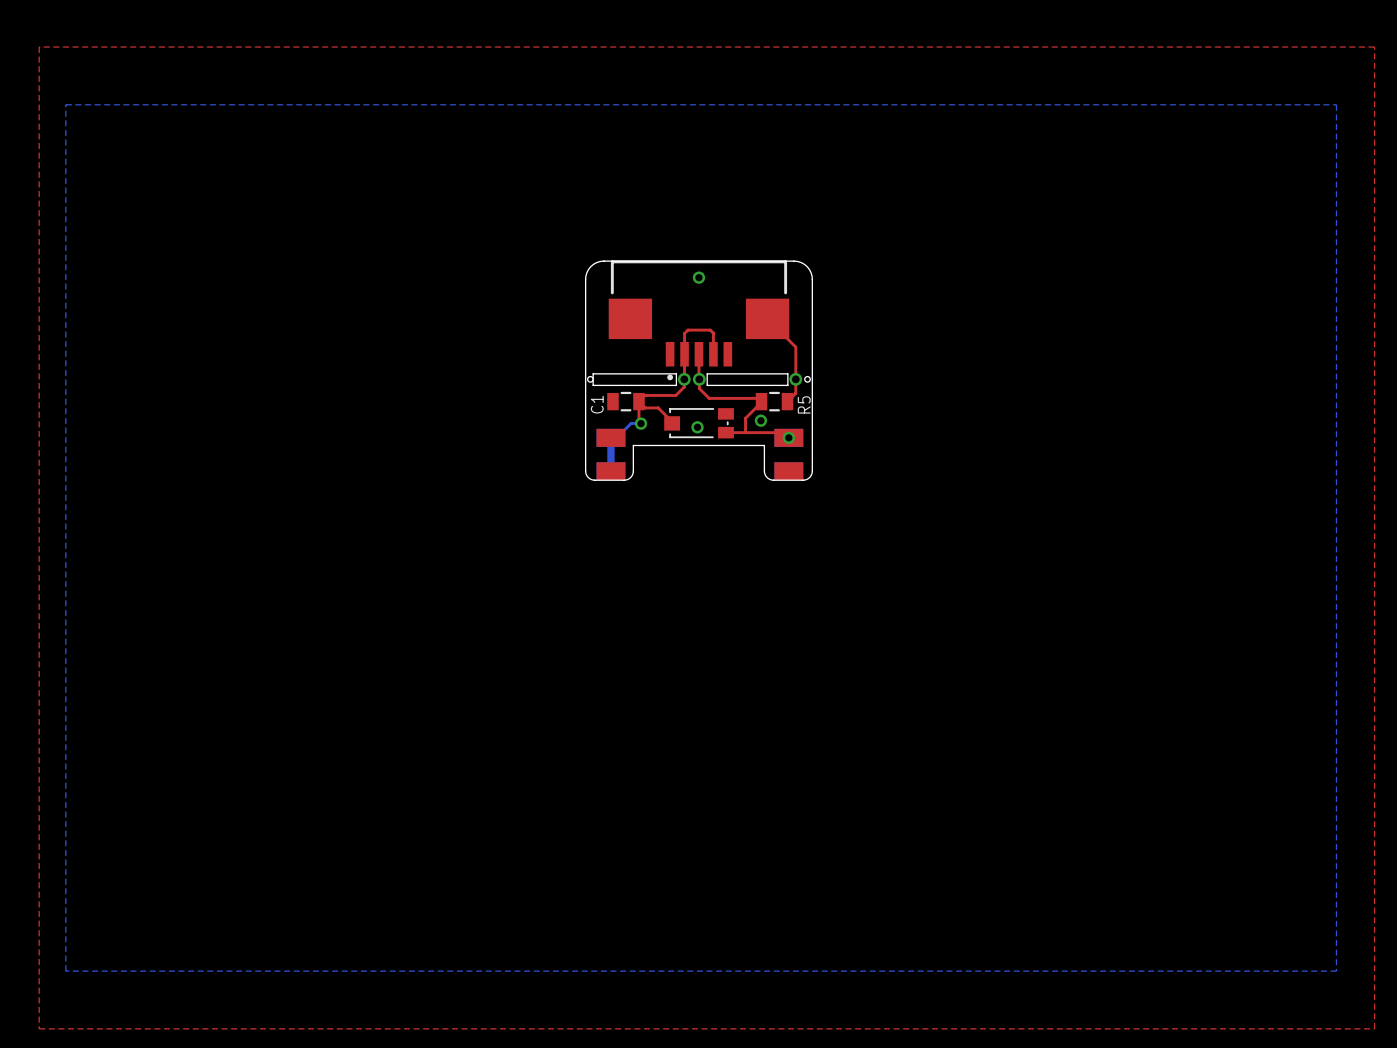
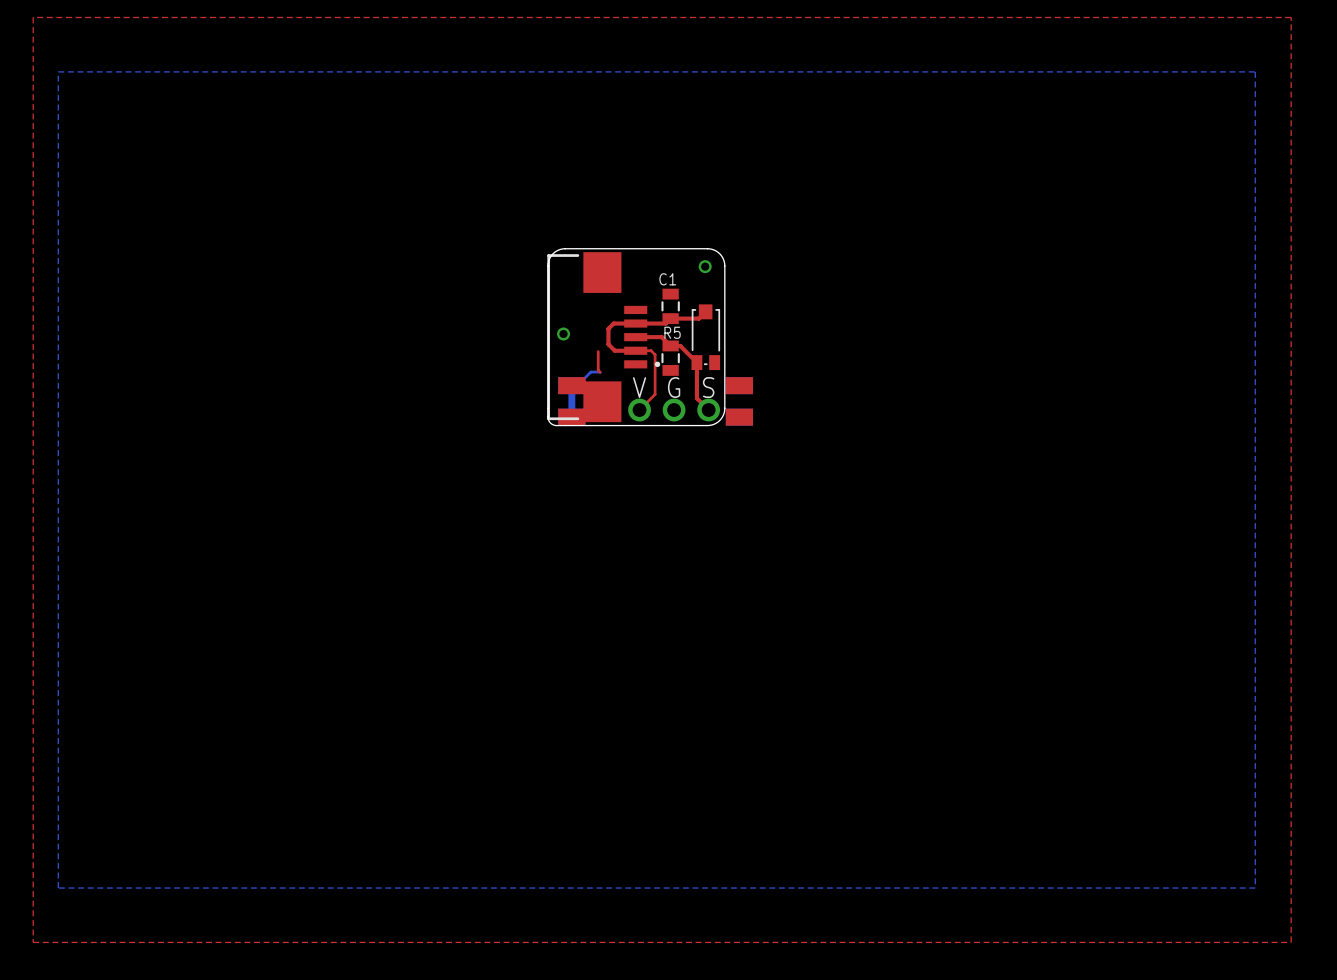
via: (698, 277) -> none
board edge: (585, 310) (586, 274) (592, 264) (601, 261) (793, 261) (805, 264) (811, 274) (812, 471) (809, 477) (803, 480) (773, 480) (767, 478) (764, 472) (764, 445) (633, 445) (633, 473) (629, 478) (624, 480) -> (547, 266) (553, 253) (565, 248) (709, 248) (718, 252) (724, 261) (724, 408) (721, 418) (716, 423) (707, 425) (584, 425)
via: none -> (705, 266)
top track: (767, 318) (795, 347) (795, 393) (787, 401) -> none
part rotation: 0° (698, 320) -> 90° counterclockwise (603, 337)
top track: (698, 354) (699, 388) (709, 398) (758, 398) (761, 401) -> none
top track: (713, 354) (713, 333) (710, 330) (687, 330) (684, 333) (684, 387) (675, 395) (645, 395) (638, 401) (645, 407) (658, 407) (672, 423) -> none
top track: none -> (705, 311) (698, 318) (670, 318) (665, 323) (613, 323) (608, 328) (608, 344) (614, 350) (651, 350) (655, 354) (655, 394) (639, 410)
board edge: (593, 373) (593, 385) (676, 385) (676, 373) (593, 373) -> none
board edge: (707, 373) (787, 373) (787, 385) (707, 385) (707, 373) -> none
hole: (590, 379) -> none
via: (684, 379) -> none
via: (699, 379) -> none
via: (795, 379) -> none
hole: (807, 379) -> none
via: none -> (563, 334)
top track: none -> (635, 337) (661, 337) (670, 345) (680, 345) (696, 362) (696, 398) (708, 410)
C1 rotation: 0° (625, 401) -> 90° clockwise (670, 306)
C1 position: (625, 401) -> (670, 306)
top track: (761, 401) (745, 418) (745, 432) -> none
R5 rotation: 0° (774, 401) -> 90° clockwise (670, 358)
R5 position: (774, 401) -> (670, 358)
R5 name position: R5 (804, 404) -> R5 (672, 332)
via: (760, 420) -> none
via: (641, 423) -> none
part rotation: 0° (699, 423) -> 90° clockwise (705, 337)
part position: (699, 423) -> (705, 337)
via: (697, 427) -> none
top track: (725, 432) (788, 432) (788, 437) -> none
via: (788, 437) -> none
text: none -> V (639, 387)
text: none -> G (674, 387)
text: none -> S (708, 387)
part: none -> (674, 410)

